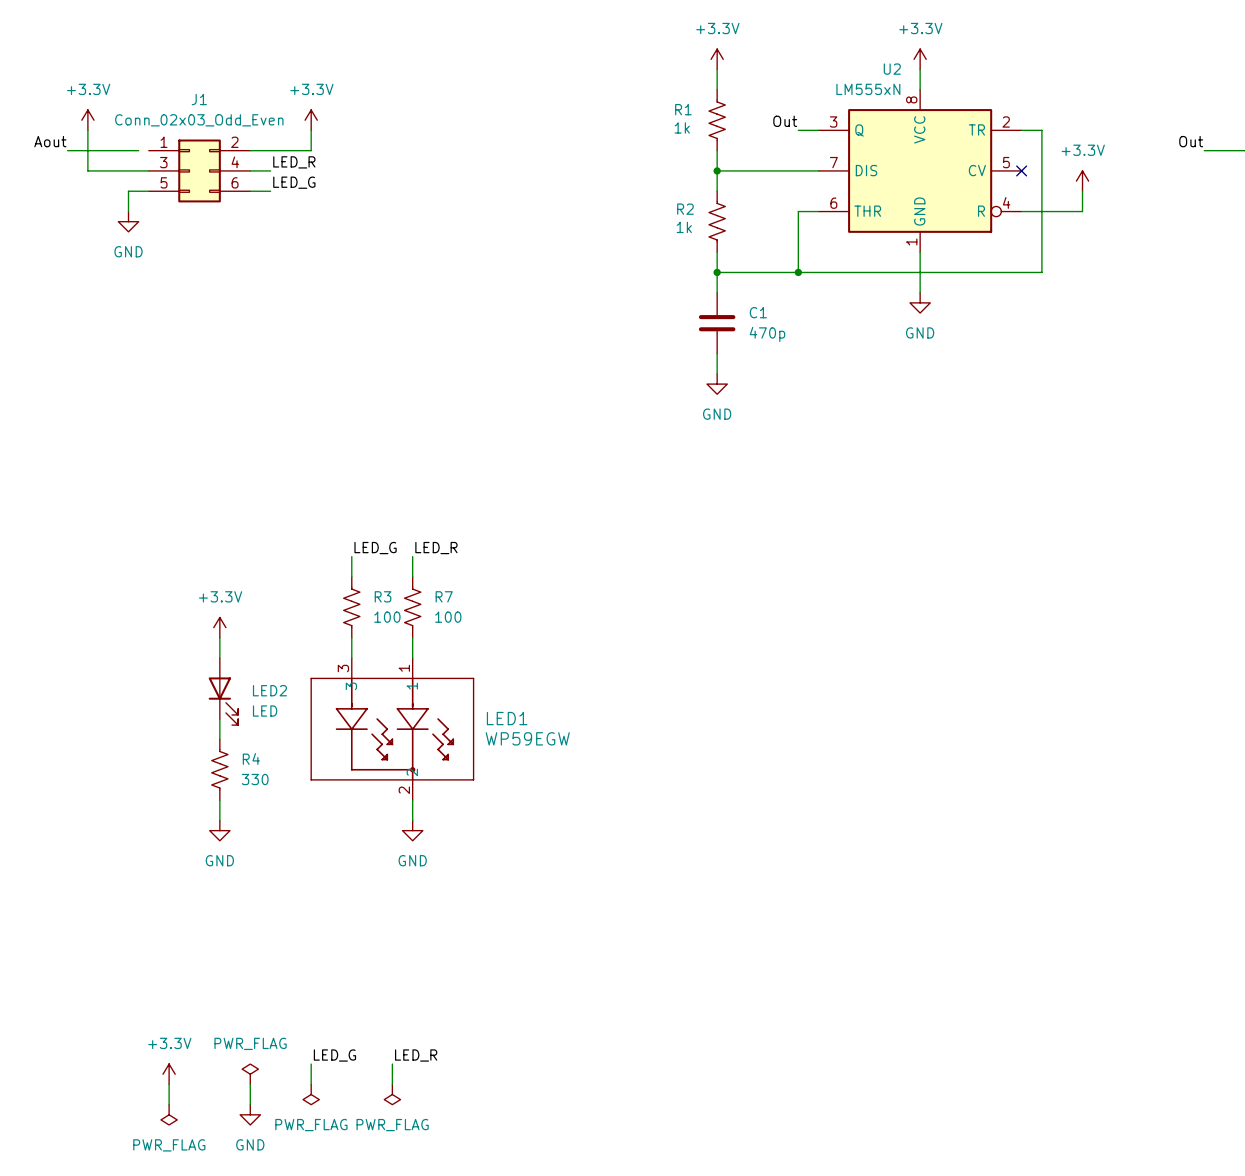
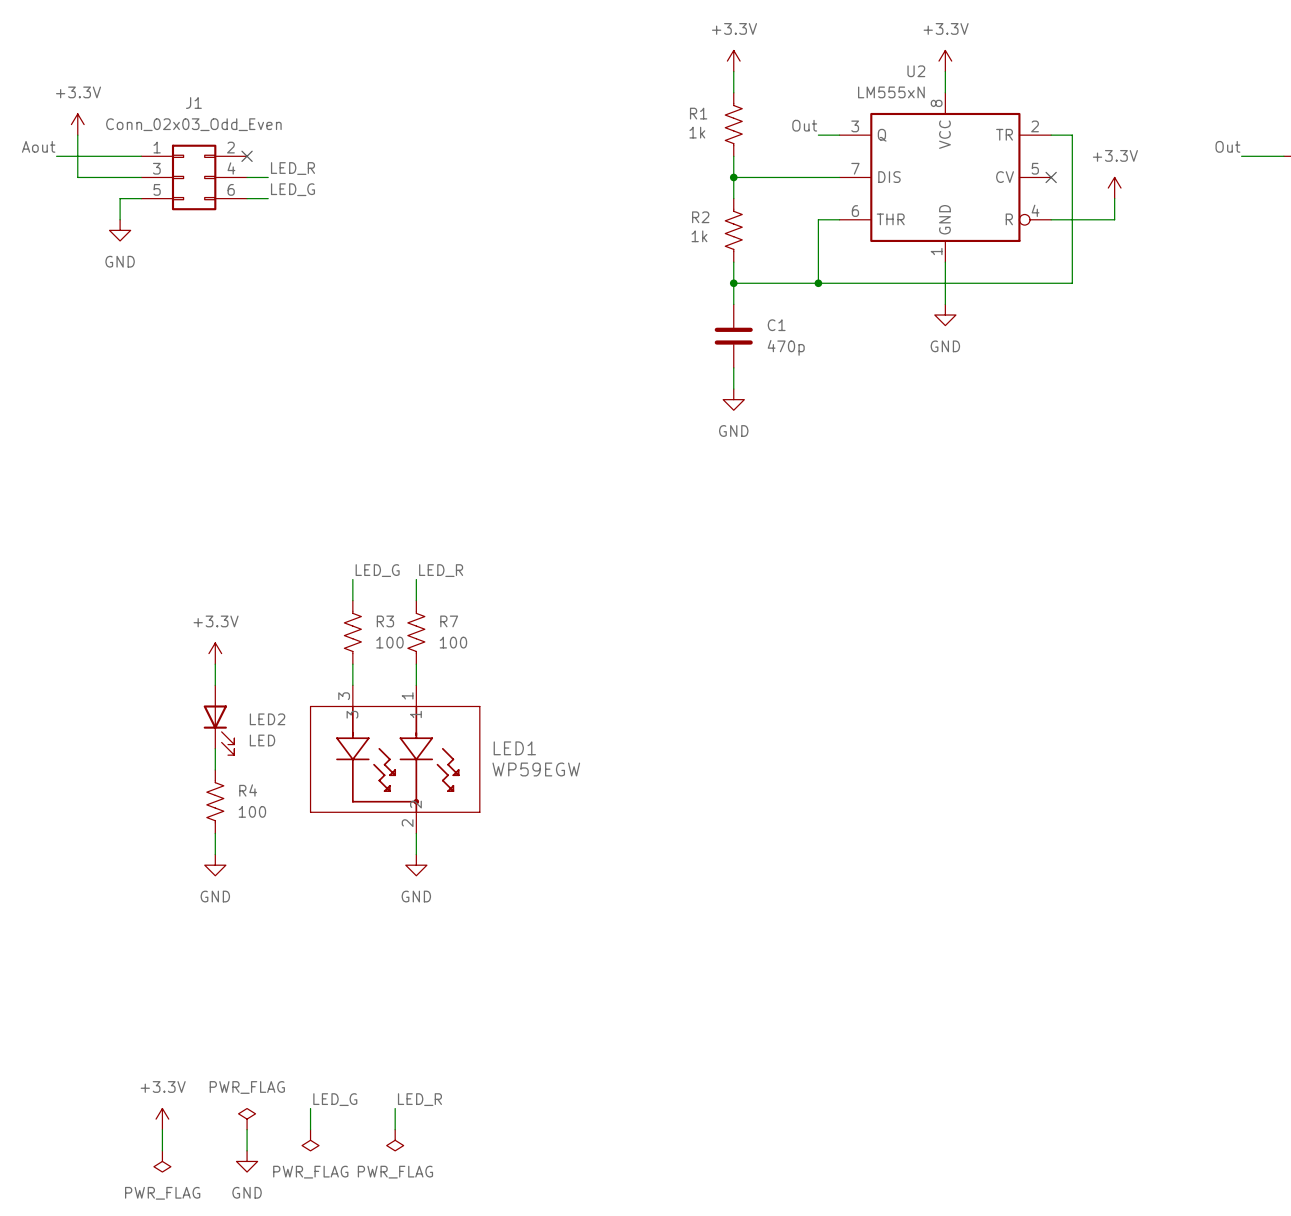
power symbol: +3.3V (311, 120) -> none
wire: (311, 130) (311, 150) (250, 150) -> none
wire: none -> (130, 156) (141, 156)
no-connect mark: none -> (247, 156)
R4 value: 330 (255, 779) -> 100 (252, 811)

